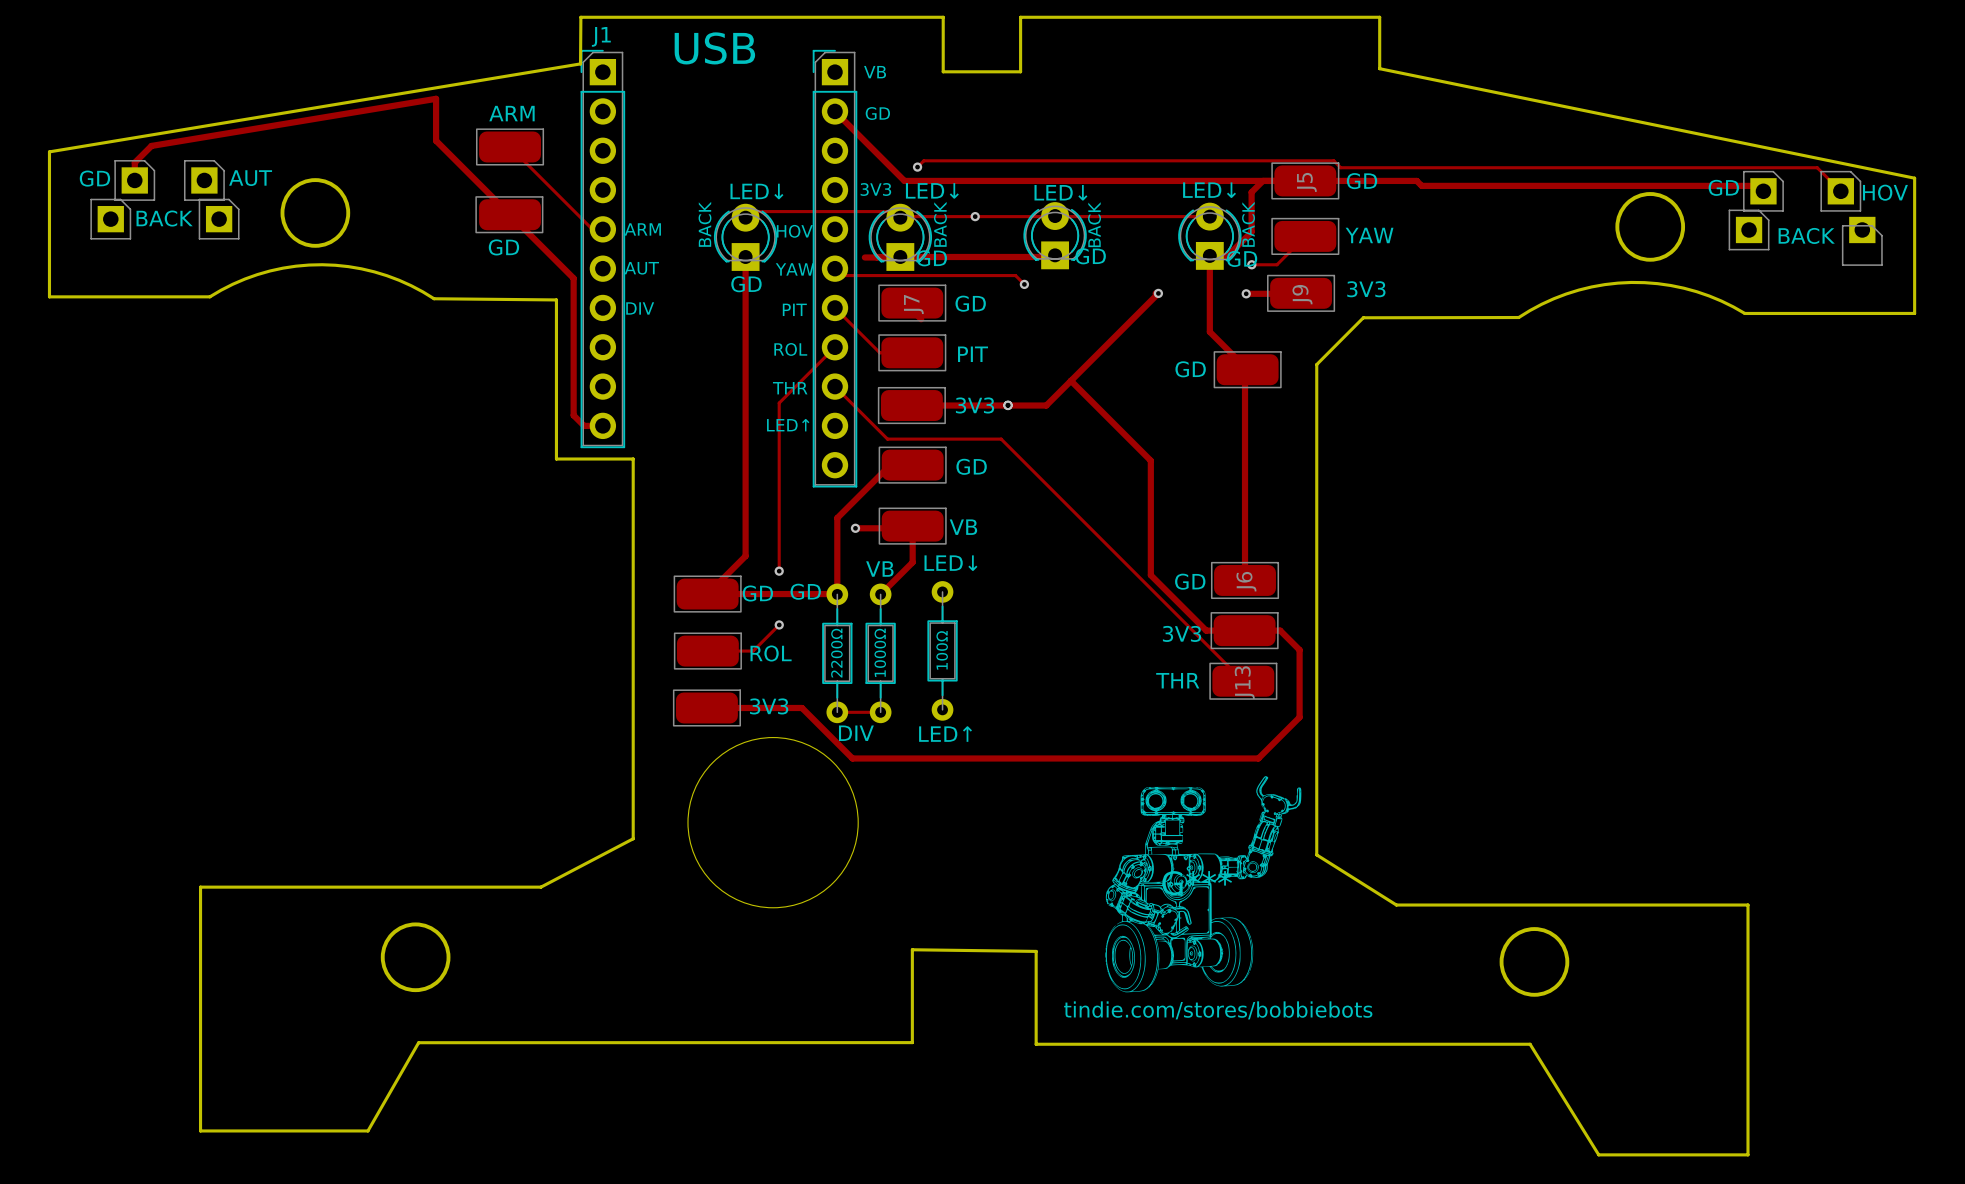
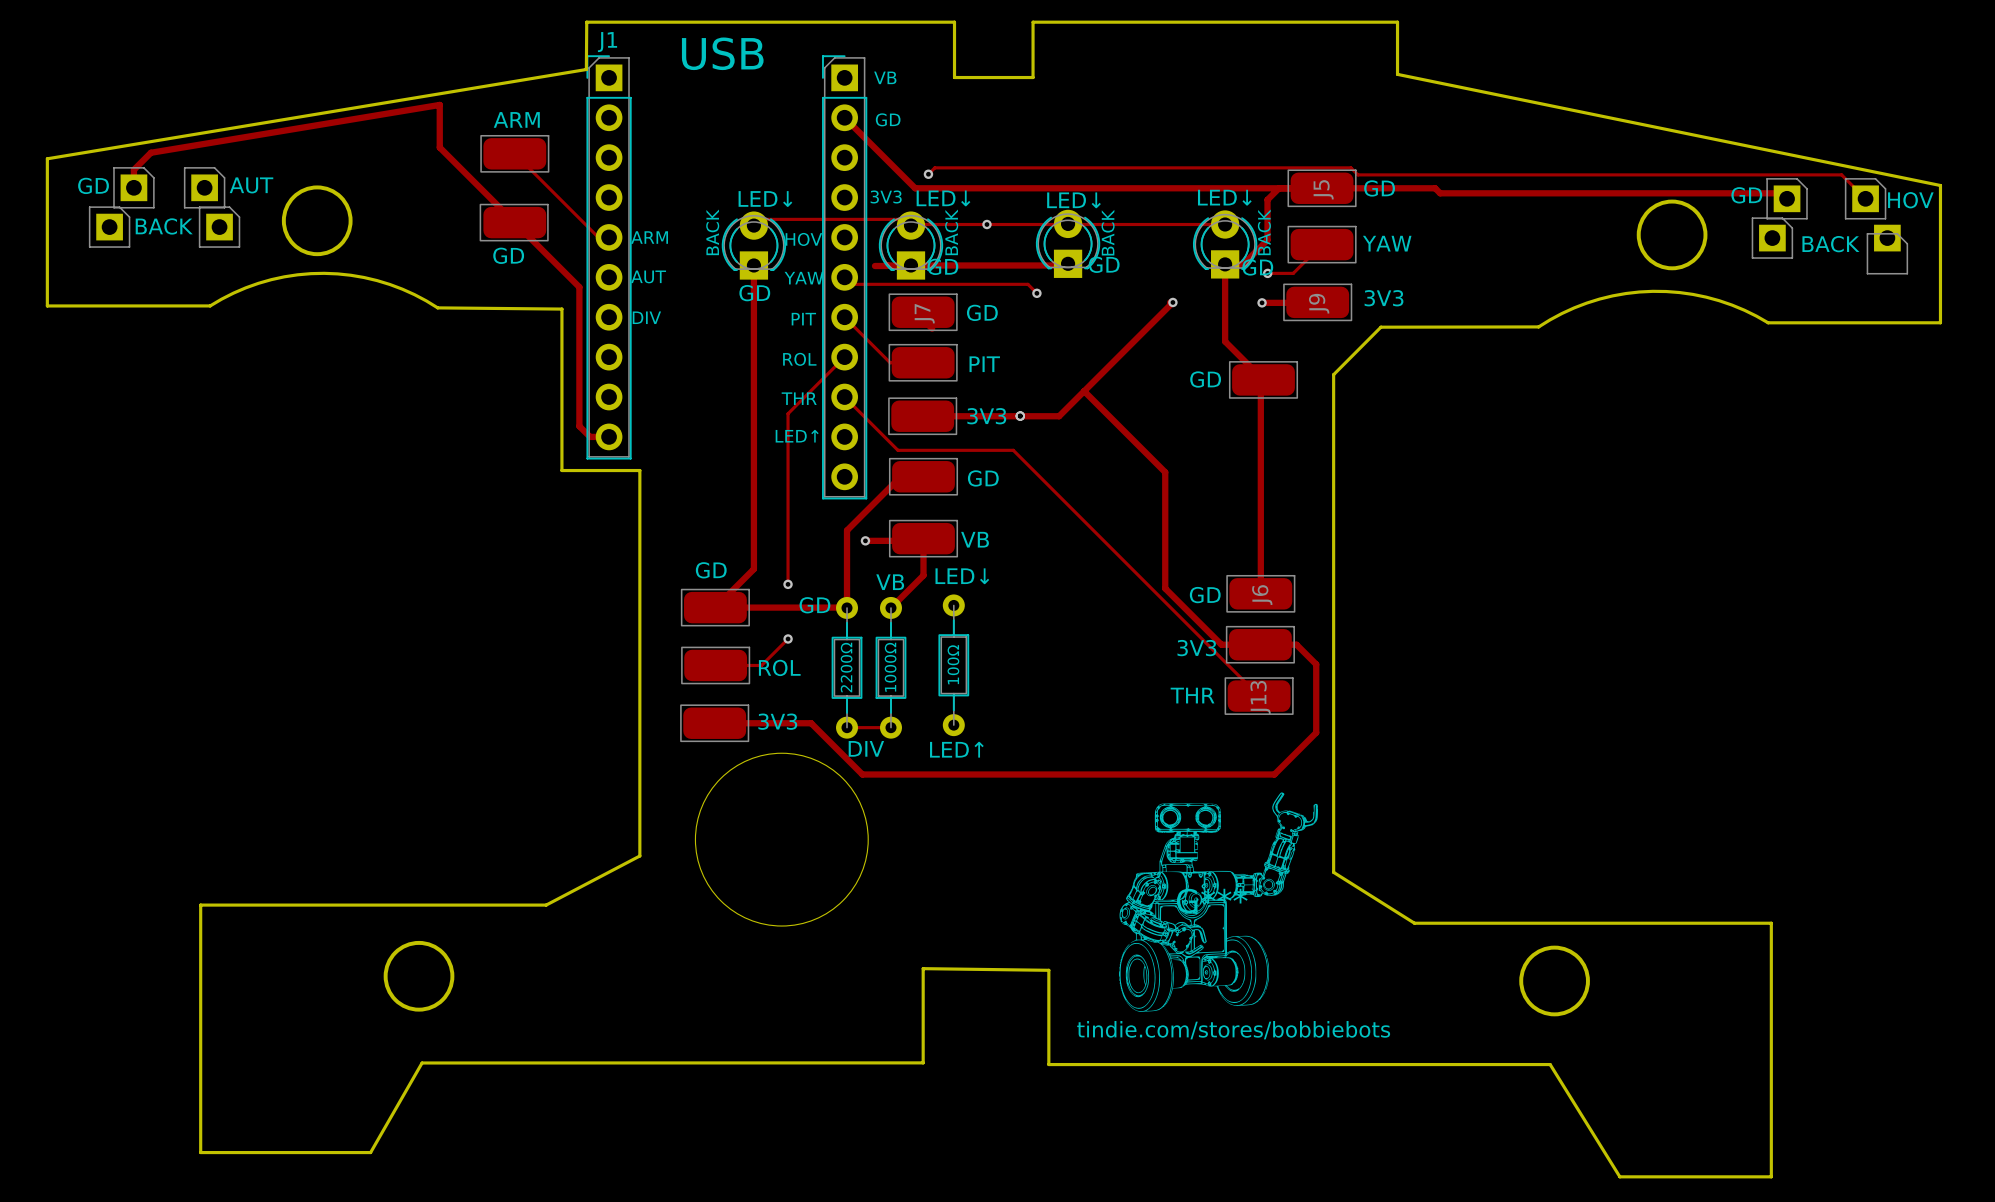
text position: GD (757, 593) -> GD (711, 570)

